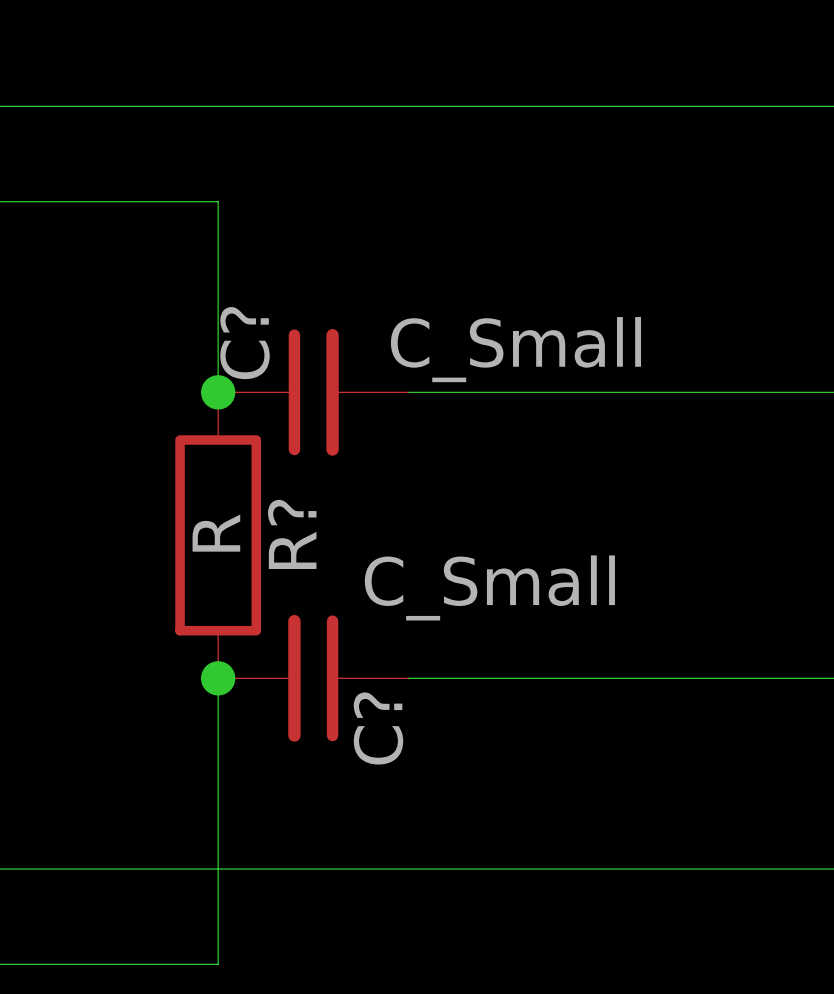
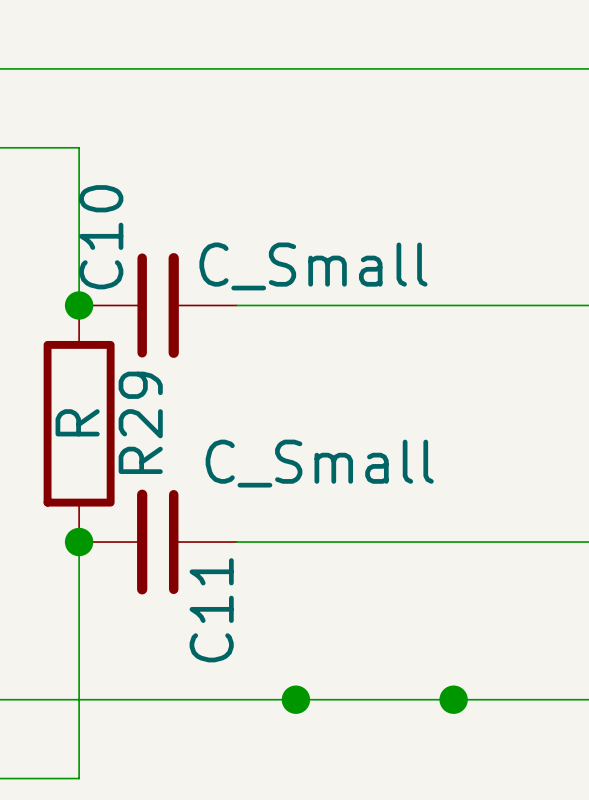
C? name: C? (245, 343) -> C10 (101, 237)
R? name: R? (292, 534) -> R29 (140, 422)
C? name: C? (378, 728) -> C11 (211, 610)
junction: none -> (295, 699)
junction: none -> (453, 699)

